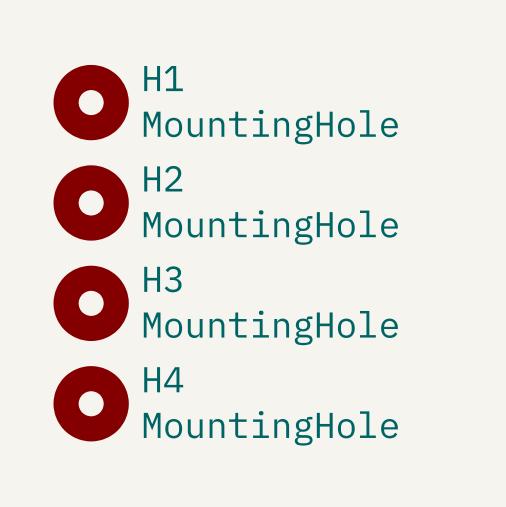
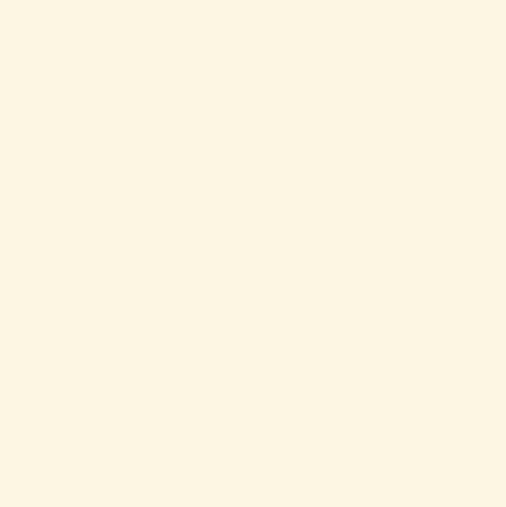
H1: MountingHole (91, 102) -> none
H2: MountingHole (91, 202) -> none
H3: MountingHole (91, 303) -> none
H4: MountingHole (91, 403) -> none

